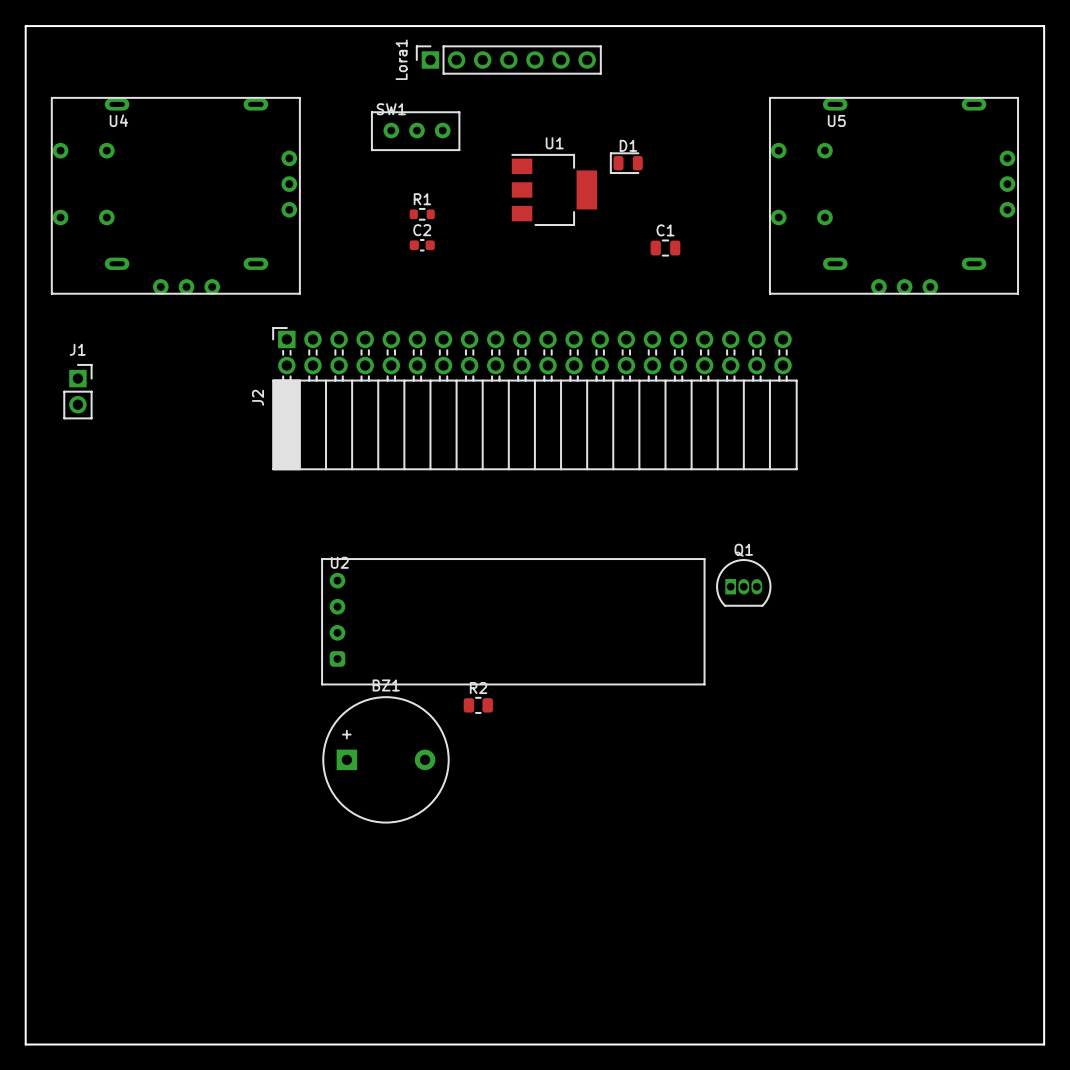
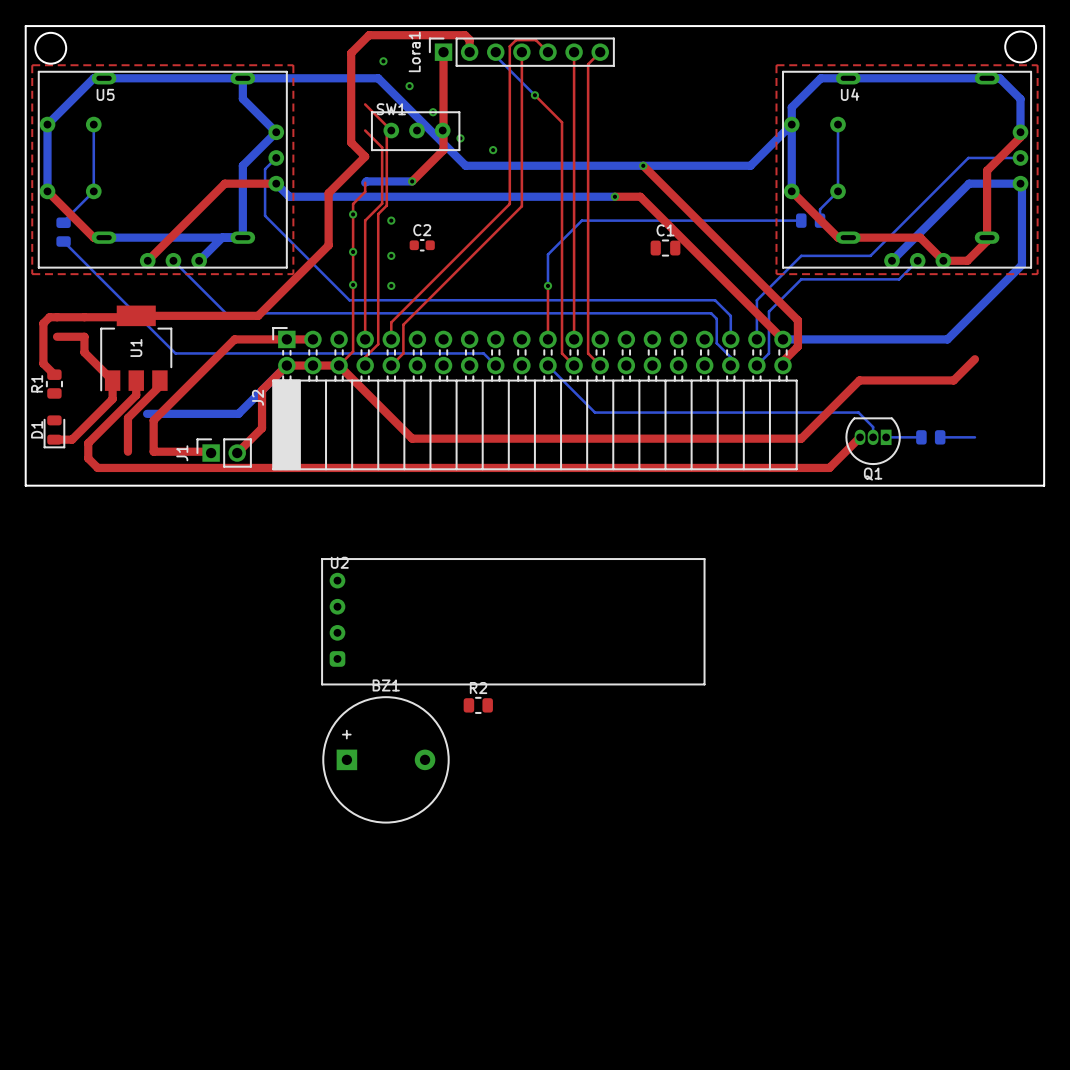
round board edge: none -> [1004, 31, 1037, 63]
round board edge: none -> [35, 32, 67, 64]
top track: none -> (443, 52) (443, 150) (412, 181)
top track: none -> (469, 52) (469, 39) (465, 35) (369, 35) (351, 53) (351, 142) (365, 156) (328, 193) (328, 245) (258, 315) (49, 317) (43, 323) (43, 363) (54, 374)
bottom track: none -> (495, 52) (495, 56) (534, 95)
top track: none -> (521, 52) (521, 206) (403, 324) (403, 353) (391, 365)
top track: none -> (547, 52) (535, 40) (516, 40) (509, 46) (509, 203) (391, 322) (391, 339)
top track: none -> (574, 52) (574, 339)
top track: none -> (600, 52) (588, 64) (588, 353) (600, 365)
Lora1 position: (508, 60) -> (521, 52)
via: none -> (383, 61)
top zone outline: none -> (32, 65) (32, 274) (293, 274) (293, 65) (32, 65)
top zone outline: none -> (776, 65) (1037, 65) (1037, 274) (776, 274) (776, 65)
bottom track: none -> (242, 78) (242, 98) (276, 132) (242, 165) (242, 237) (104, 237)
via: none -> (409, 86)
top track: none -> (534, 95) (562, 122) (562, 353) (574, 365)
via: none -> (534, 95)
top track: none -> (365, 104) (386, 126) (386, 205) (378, 214) (378, 344) (365, 357) (365, 365)
via: none -> (433, 112)
bottom track: none -> (93, 124) (93, 191) (63, 222)
bottom track: none -> (791, 124) (750, 165) (465, 165) (378, 78) (93, 78) (47, 124) (47, 191)
bottom track: none -> (838, 124) (838, 191) (820, 209) (820, 220)
top track: none -> (365, 130) (382, 147) (382, 203) (365, 220) (365, 339)
top track: none -> (1020, 132) (1020, 137) (987, 170) (987, 241) (967, 260) (943, 260) (920, 237) (838, 237) (791, 191)
bottom track: none -> (1020, 132) (1020, 99) (999, 78) (820, 78) (791, 107) (791, 191)
via: none -> (460, 138)
U1 name position: U1 (554, 143) -> U1 (136, 347)
via: none -> (493, 150)
bottom track: none -> (276, 157) (265, 169) (265, 215) (349, 300) (715, 300) (730, 315) (730, 339)
bottom track: none -> (1020, 157) (968, 157) (870, 255) (801, 255) (756, 300) (756, 339)
D1 rotation: 0° (626, 163) -> 90° counterclockwise (54, 431)
D1 position: (626, 163) -> (54, 431)
top track: none -> (643, 165) (797, 320) (797, 346) (783, 361) (783, 365)
via: none -> (643, 165)
bottom track: none -> (412, 181) (365, 182)
via: none -> (412, 181)
top track: none -> (365, 182) (365, 191) (353, 203) (353, 351) (339, 365)
top track: none -> (276, 183) (224, 183) (147, 260)
bottom track: none -> (276, 183) (289, 196) (614, 196)
U1 rotation: 0° (554, 189) -> 90° counterclockwise (136, 348)
U1 position: (554, 189) -> (136, 348)
top track: none -> (47, 191) (93, 237) (104, 237)
U4 position: (175, 196) -> (907, 169)
top track: none -> (614, 196) (640, 196) (783, 339)
via: none -> (614, 196)
U5 position: (893, 196) -> (162, 169)
R1 name position: R1 (422, 199) -> R1 (37, 383)
R1 footprint: [409, 208, 435, 221] -> [46, 369, 63, 399]
via: none -> (353, 214)
via: none -> (391, 220)
bottom track: none -> (801, 220) (581, 220) (547, 254) (547, 285)
part: none -> (810, 220)
part: none -> (63, 232)
bottom track: none -> (222, 237) (199, 260)
bottom track: none -> (63, 241) (175, 353) (483, 353) (495, 365)
via: none -> (353, 251)
via: none -> (391, 255)
bottom track: none -> (173, 260) (225, 313) (711, 313) (716, 318) (716, 343) (730, 357) (730, 365)
bottom track: none -> (891, 260) (969, 183) (1021, 185) (1021, 265) (947, 339) (783, 339)
bottom track: none -> (917, 260) (899, 279) (801, 279) (768, 311) (768, 353) (756, 365)
via: none -> (353, 284)
via: none -> (391, 285)
top track: none -> (547, 285) (547, 339)
via: none -> (547, 285)
top track: none -> (57, 336) (84, 336) (84, 352) (112, 380) (112, 399) (72, 439) (54, 439)
top track: none -> (312, 339) (234, 339) (153, 420) (153, 451) (211, 453)
top track: none -> (974, 359) (953, 380) (859, 380) (801, 438) (412, 438) (339, 365)
bottom track: none -> (286, 365) (238, 413) (147, 413)
top track: none -> (339, 365) (286, 365) (262, 390) (262, 428) (237, 453)
bottom track: none -> (547, 365) (594, 412) (858, 412) (873, 427) (873, 437)
top track: none -> (136, 380) (136, 395) (88, 443) (88, 458) (97, 467) (829, 467) (860, 437)
top track: none -> (159, 380) (159, 386) (127, 418) (127, 451)
J1 rotation: 0° (77, 391) -> 90° counterclockwise (224, 453)
J1 position: (77, 391) -> (224, 453)
bottom track: none -> (886, 437) (921, 437)
part: none -> (930, 437)
bottom track: none -> (940, 437) (974, 437)
board edge: (25, 485) (25, 1044) (1044, 1044) (1044, 485) -> (25, 485) (1044, 485)
Q1 rotation: 0° (743, 582) -> 180° (873, 441)
Q1 position: (743, 582) -> (873, 441)

